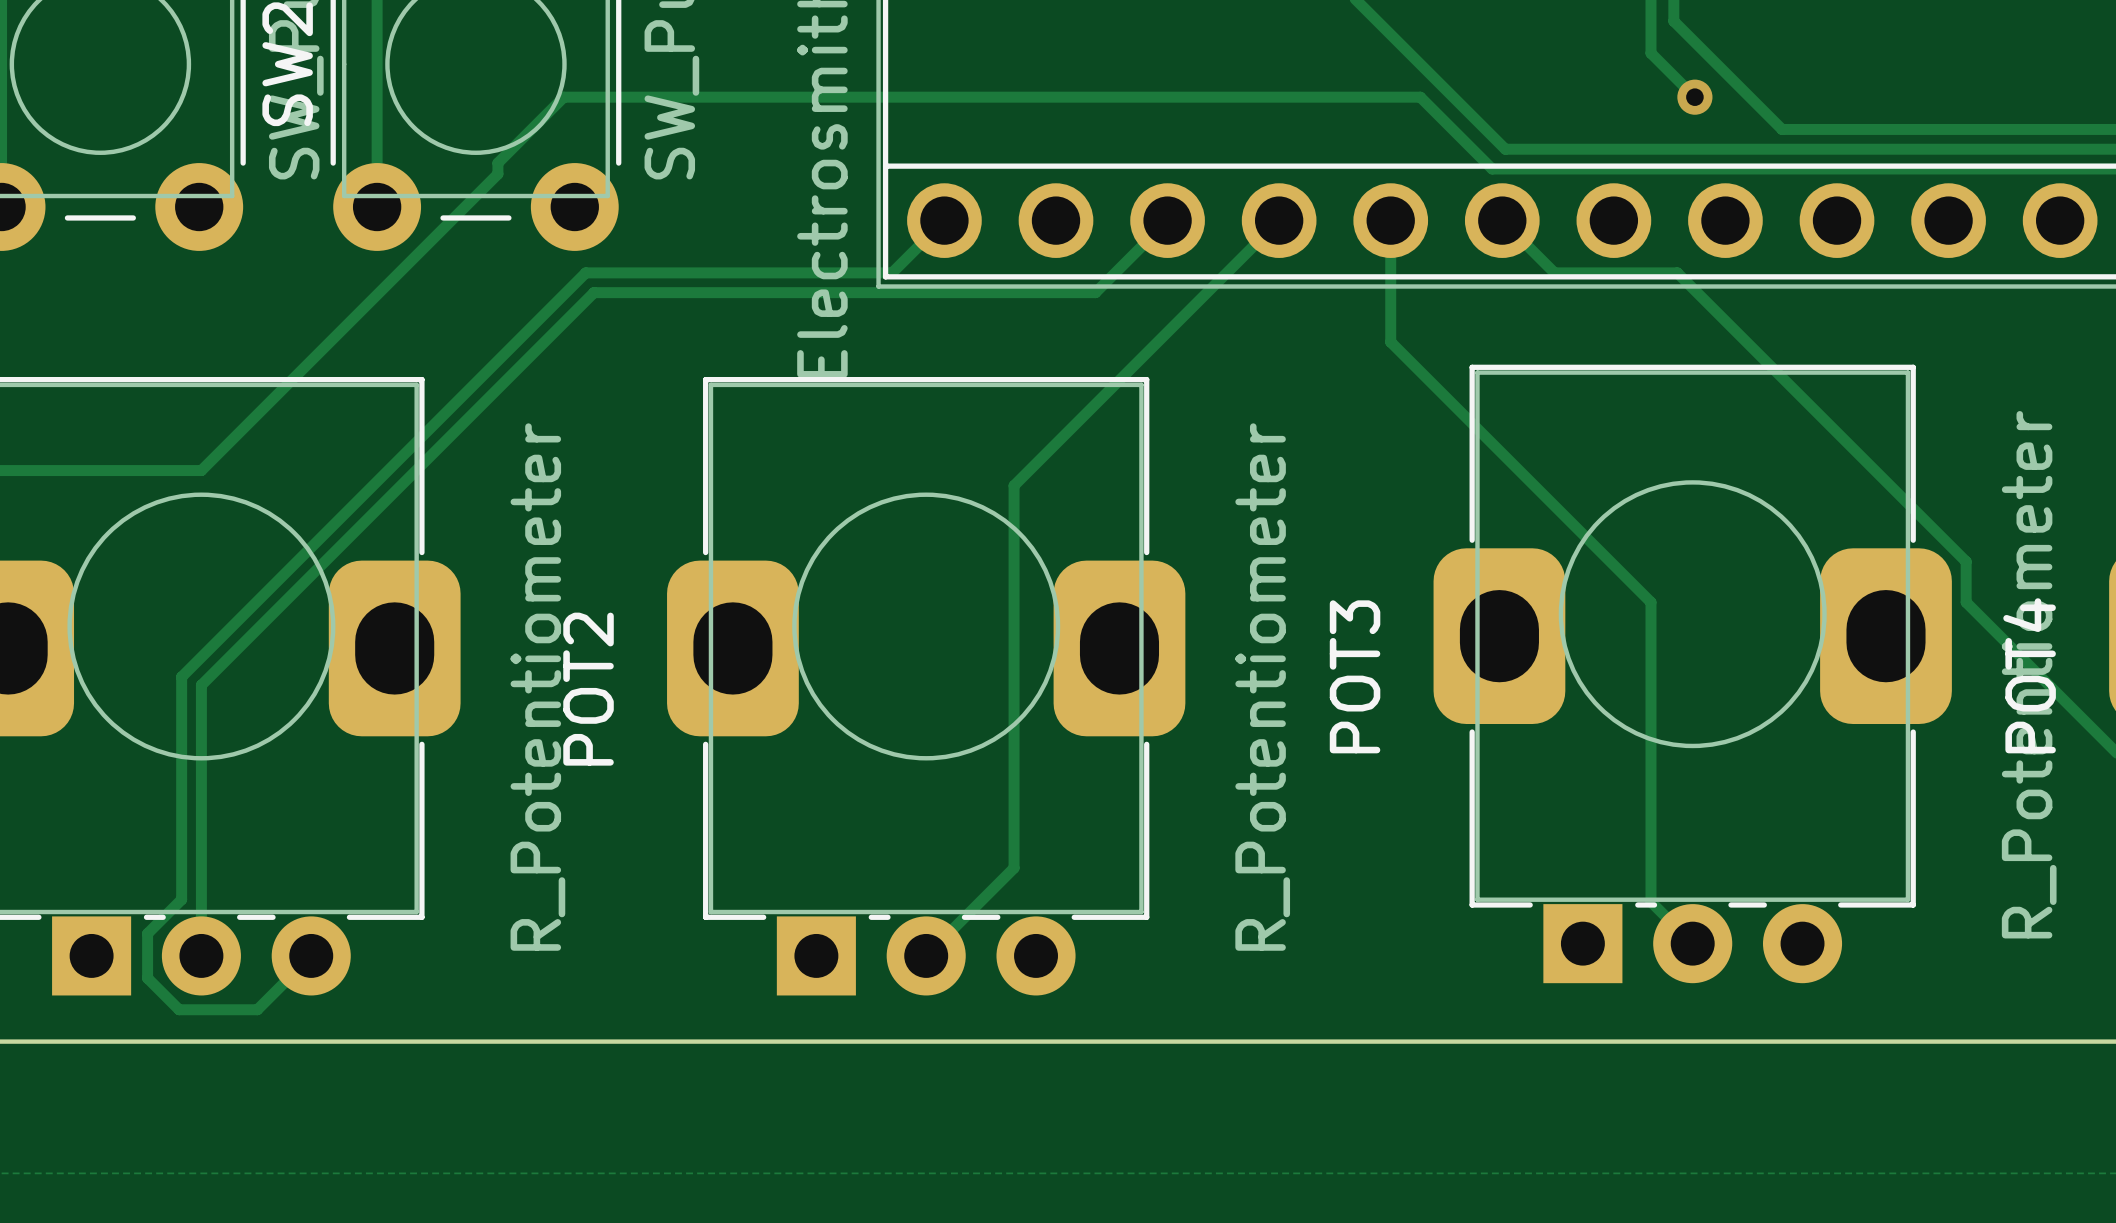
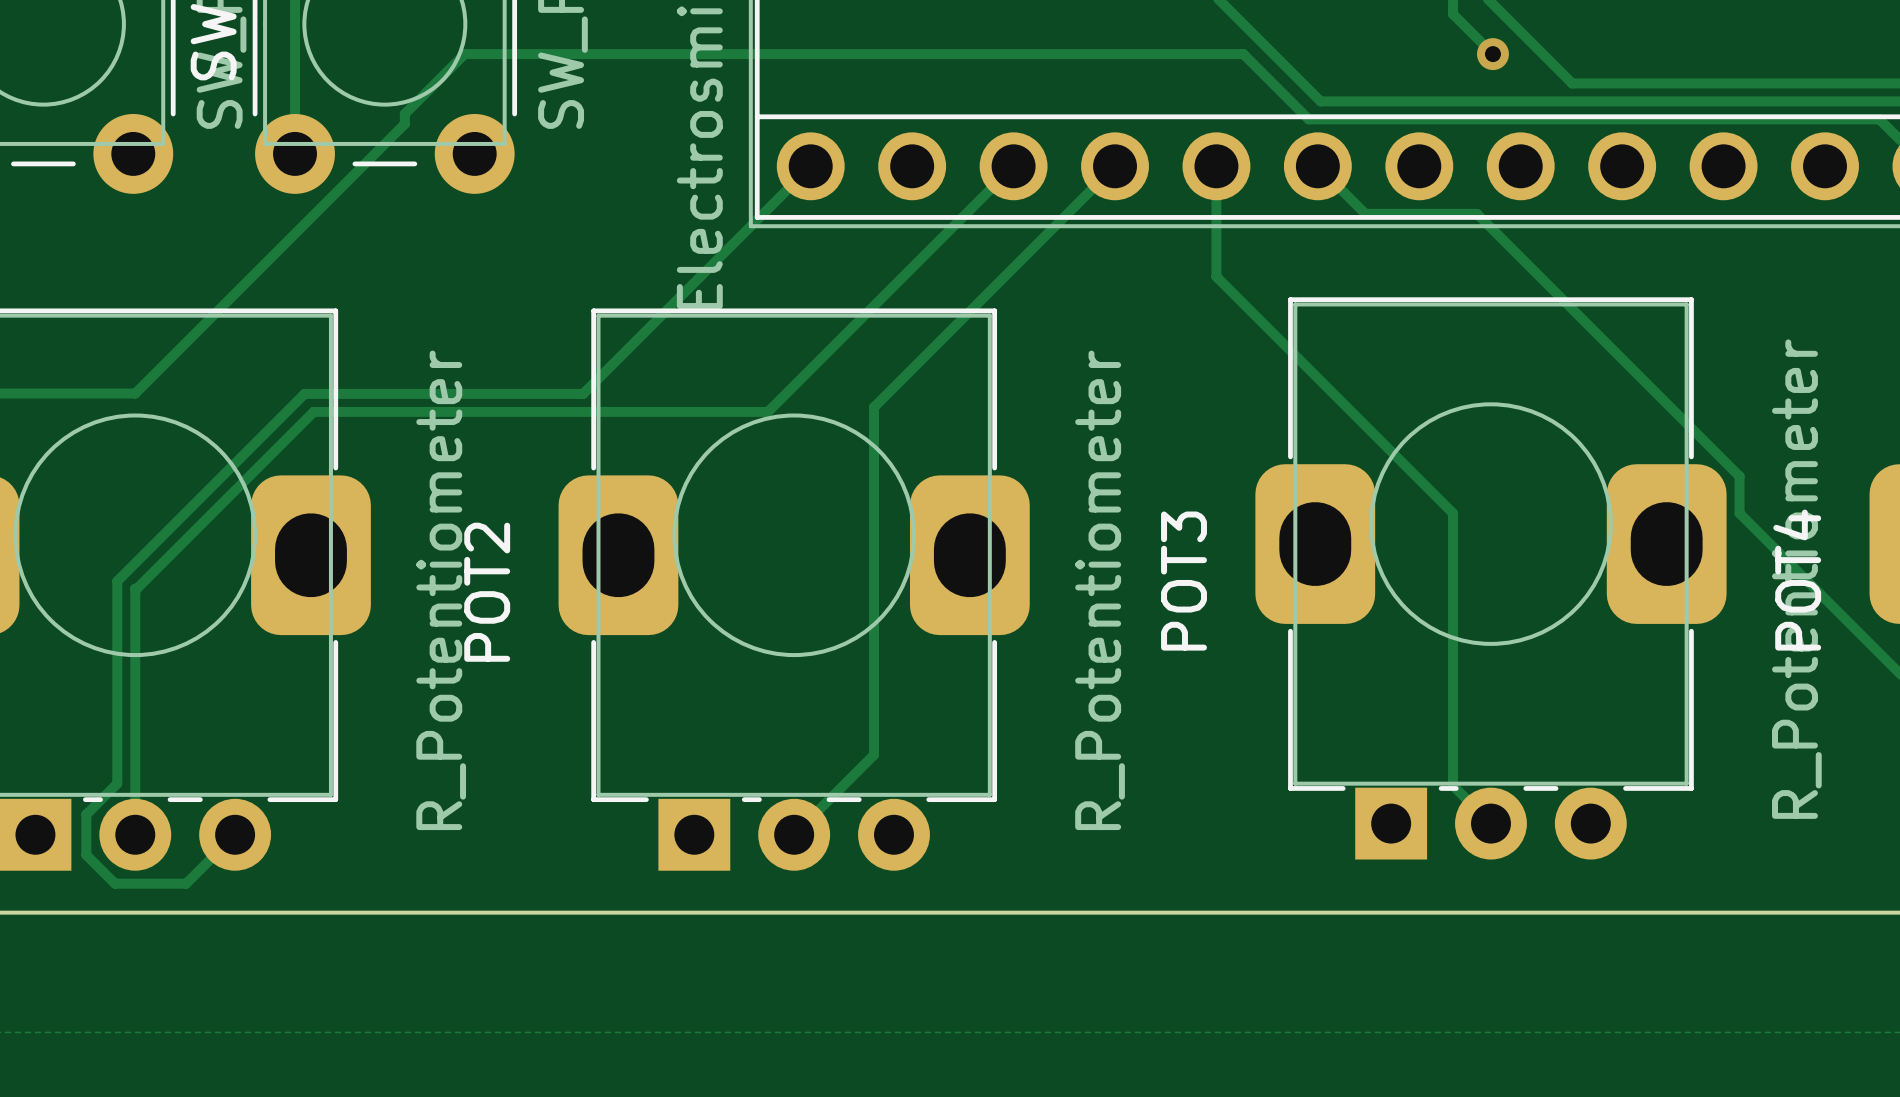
track: (892, 272) (585, 272) (387, 470) -> (763, 213) (583, 393) (304, 393)
track: (1095, 292) (593, 292) (201, 685) -> (948, 231) (768, 411) (313, 411) (135, 588)

